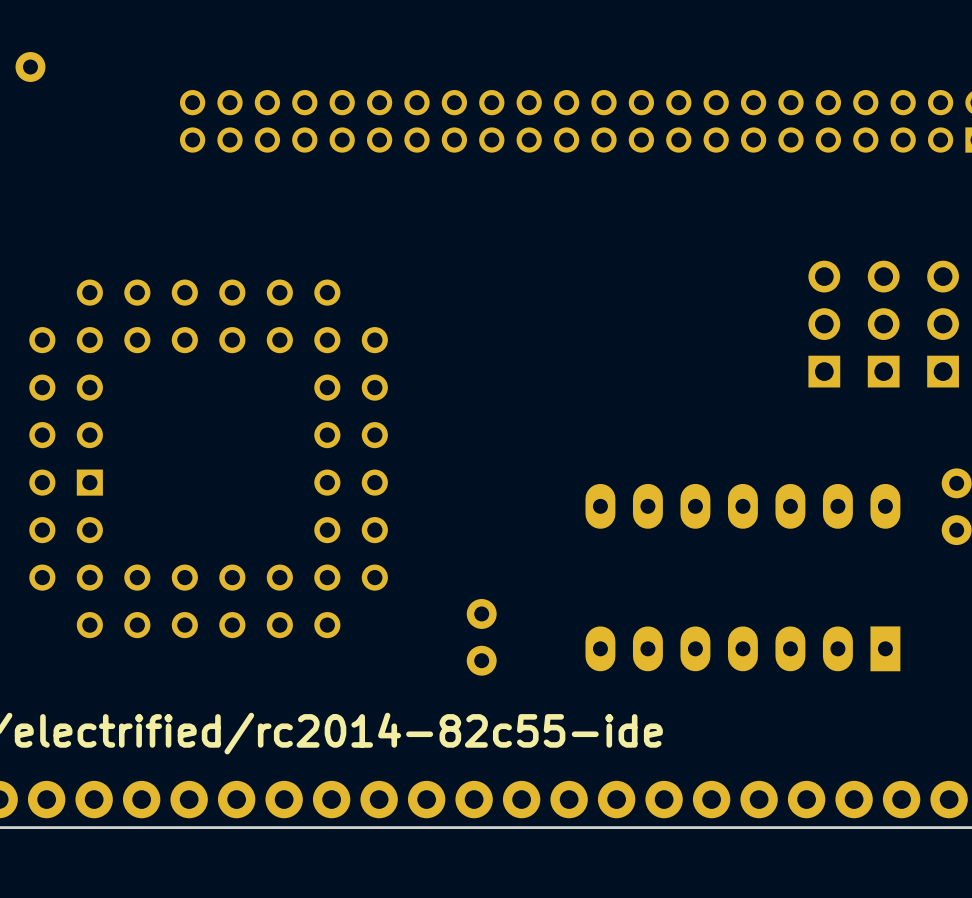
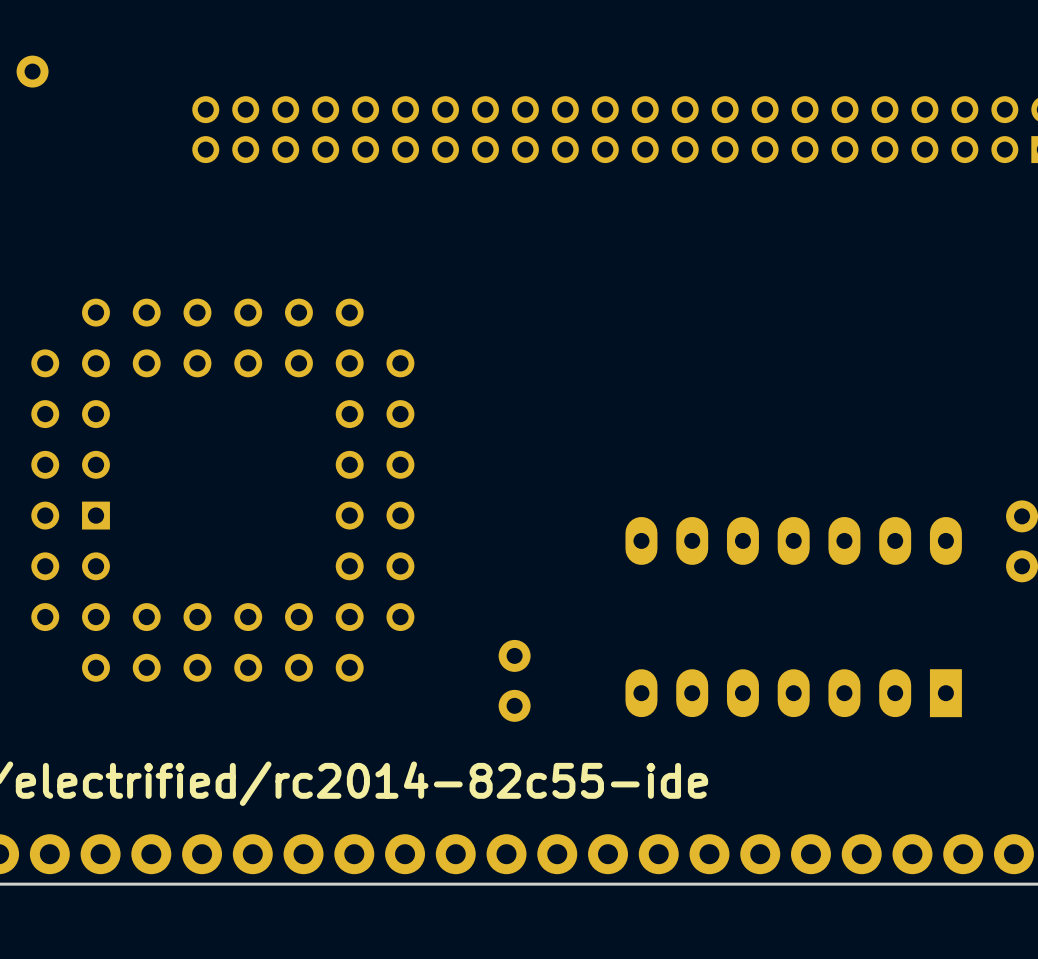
part: (824, 324) -> none
part: (883, 324) -> none
part: (943, 324) -> none

